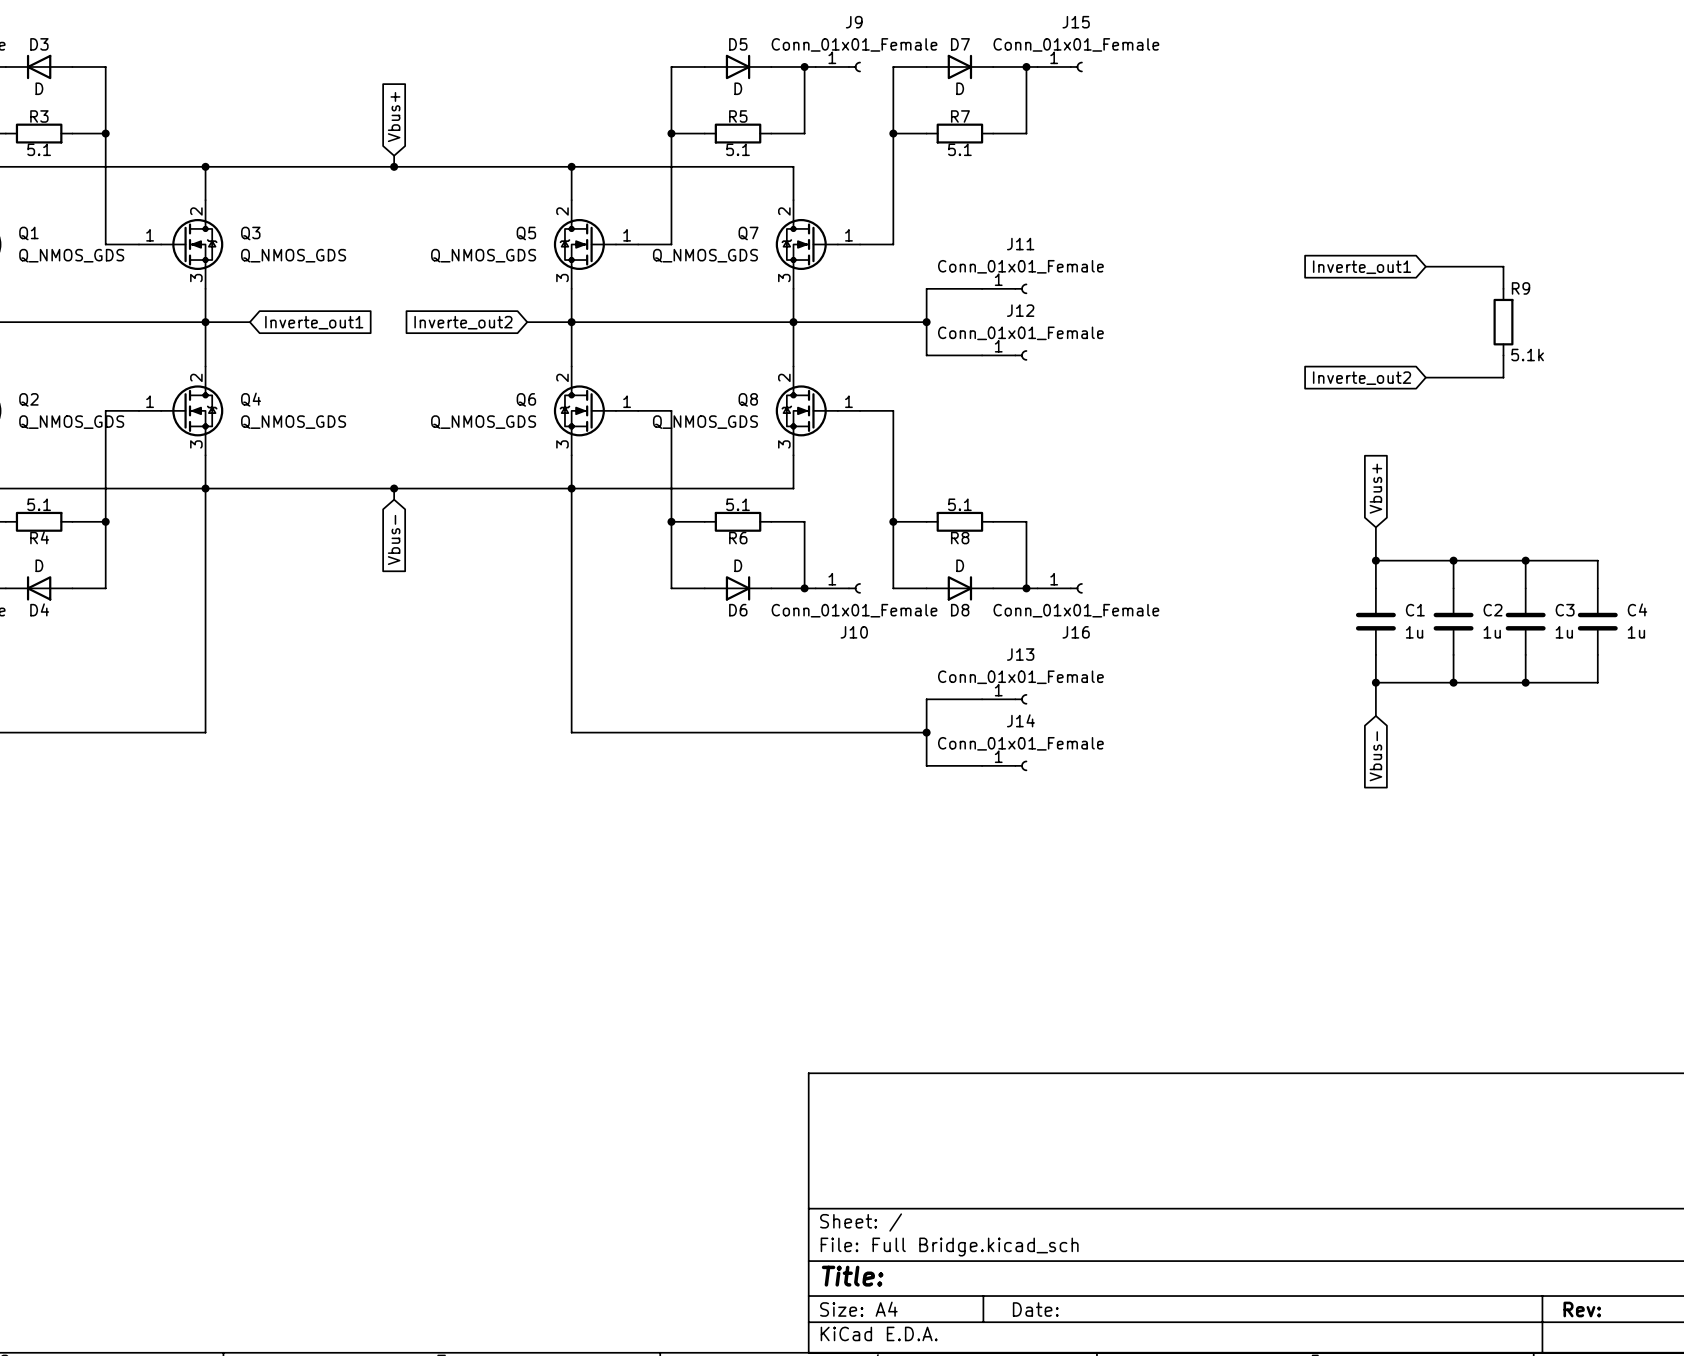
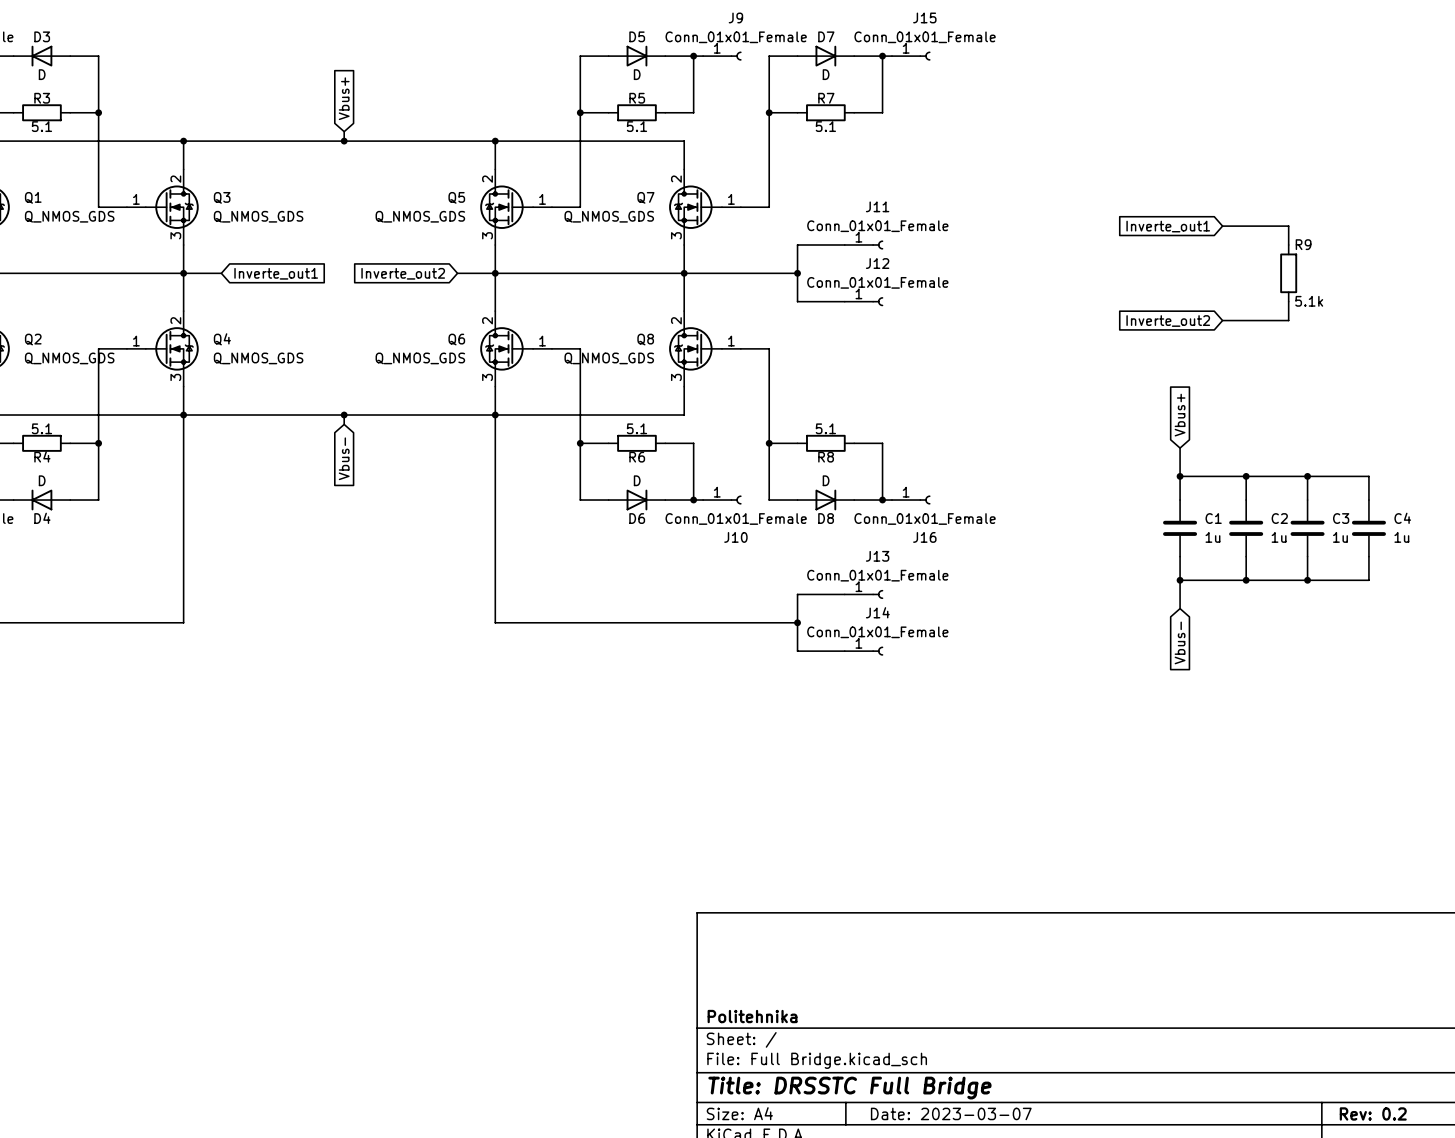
title block: none -> Politehnika (752, 1016)
title block: Title: (852, 1276) -> Title: DRSSTC Full Bridge (849, 1088)
title block: Date: (1035, 1309) -> Date: 2023-03-07 (951, 1113)
title block: Rev: (1582, 1309) -> Rev: 0.2 (1373, 1113)

